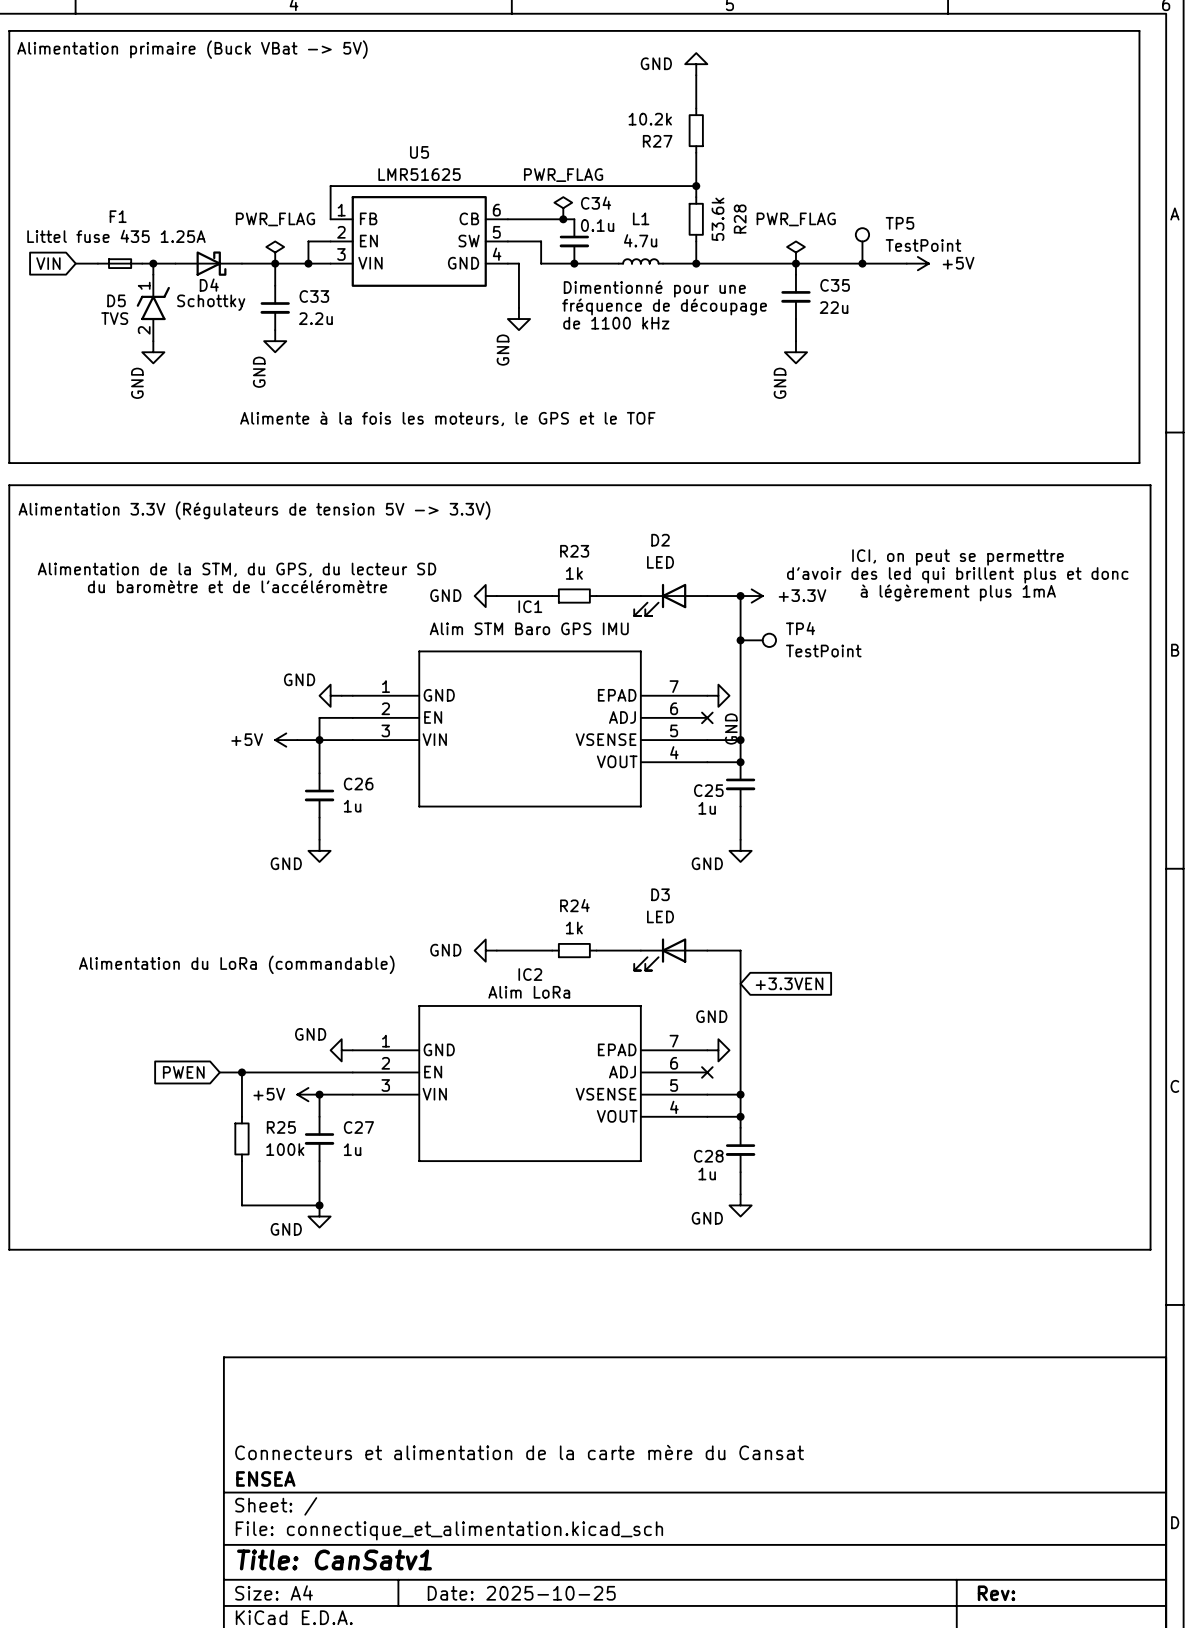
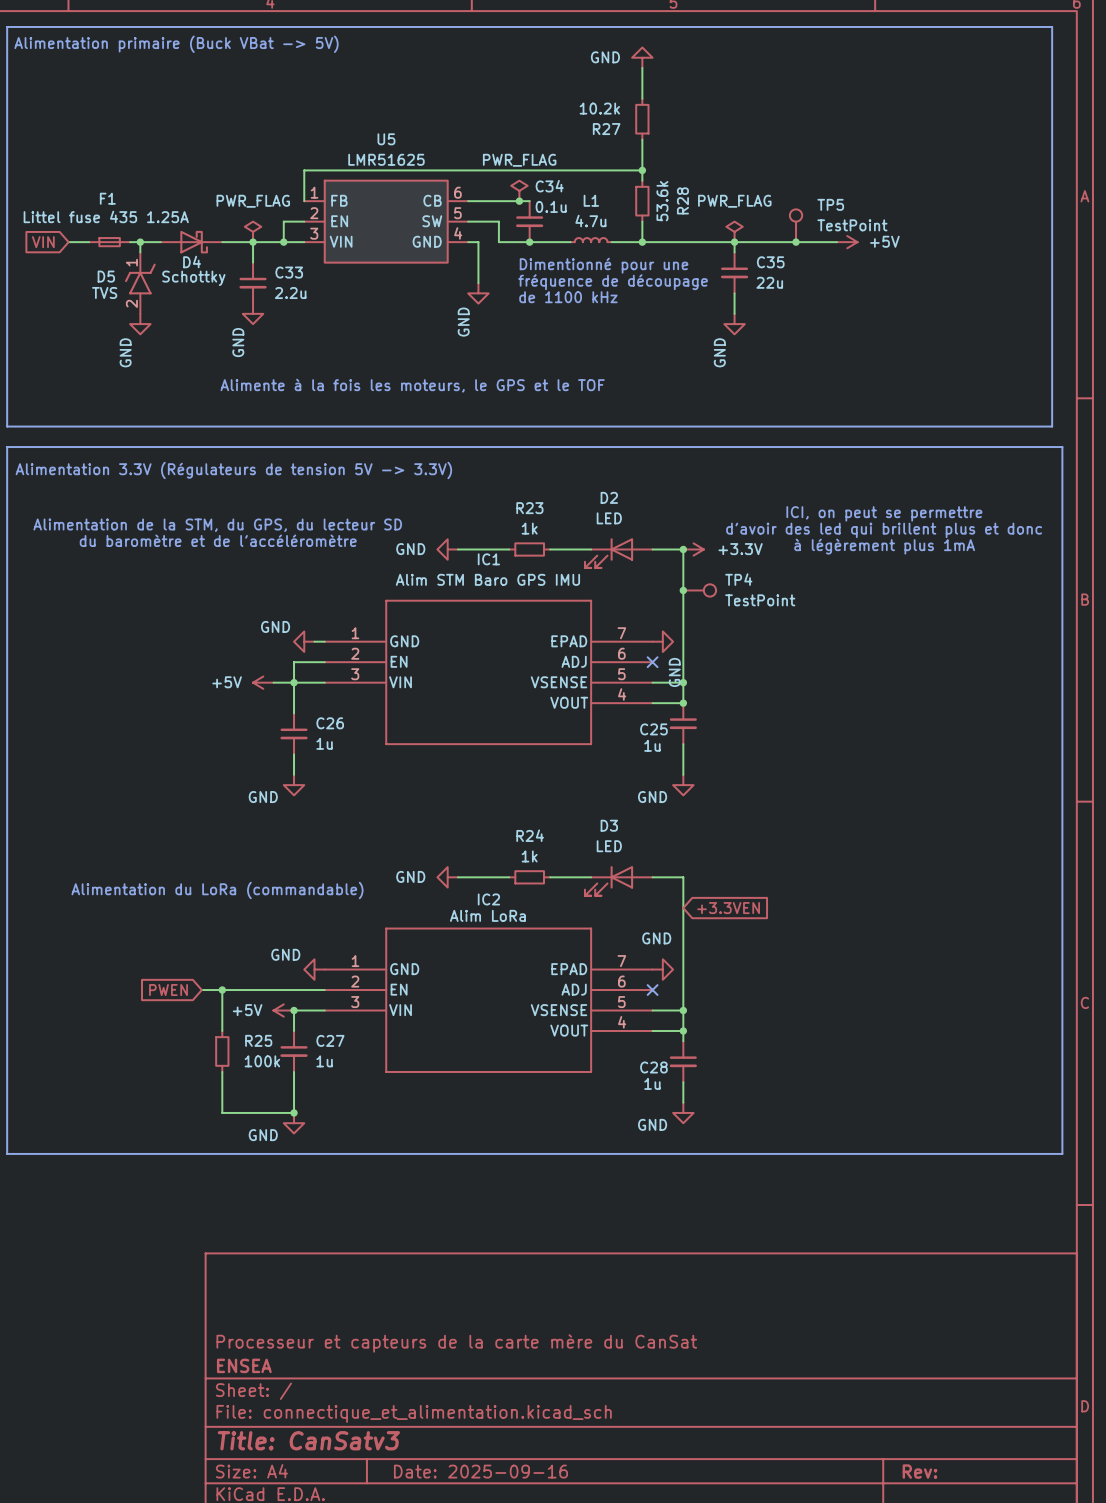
title block: Connecteurs et alimentation de la carte mère du Cansat (519, 1452) -> Processeur et capteurs de la carte mère du CanSat (456, 1343)
title block: Title: CanSatv1 (334, 1559) -> Title: CanSatv3 (308, 1440)
title block: Date: 2025-10-25 (521, 1593) -> Date: 2025-09-16 (480, 1471)

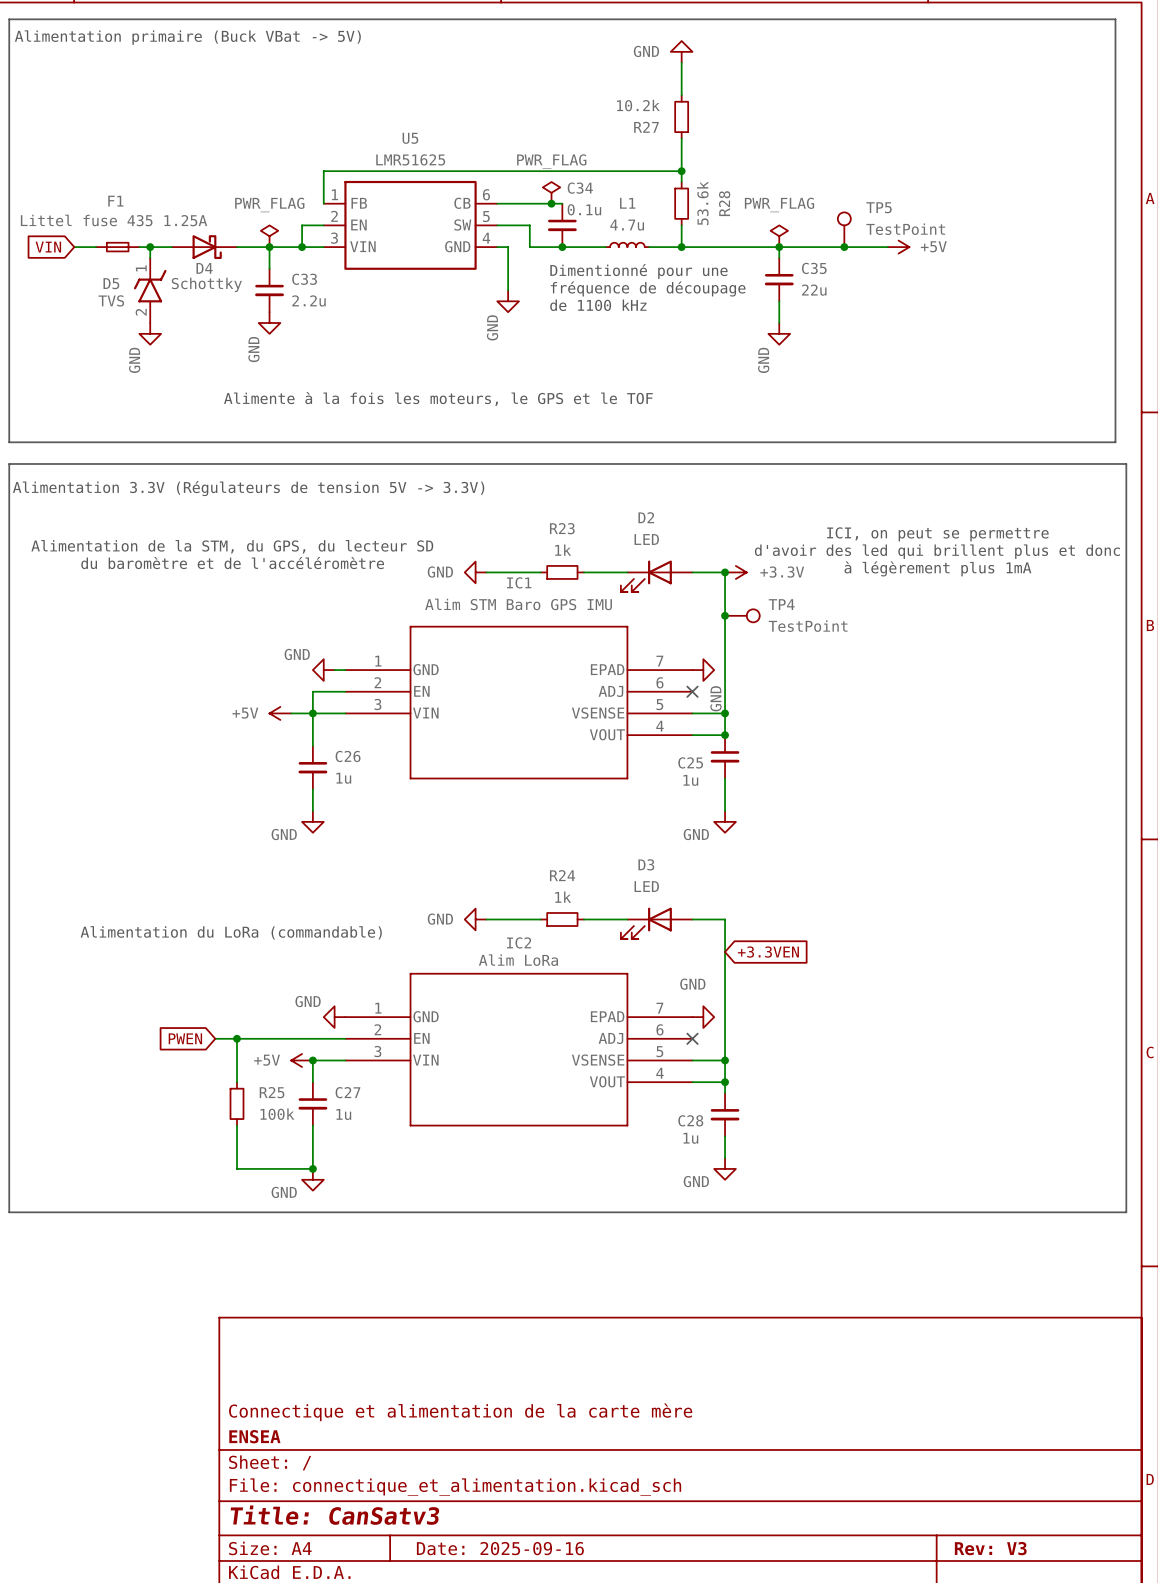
title block: Processeur et capteurs de la carte mère du CanSat (456, 1343) -> Connectique et alimentation de la carte mère (460, 1412)
title block: Rev: (919, 1471) -> Rev: V3 (990, 1548)

